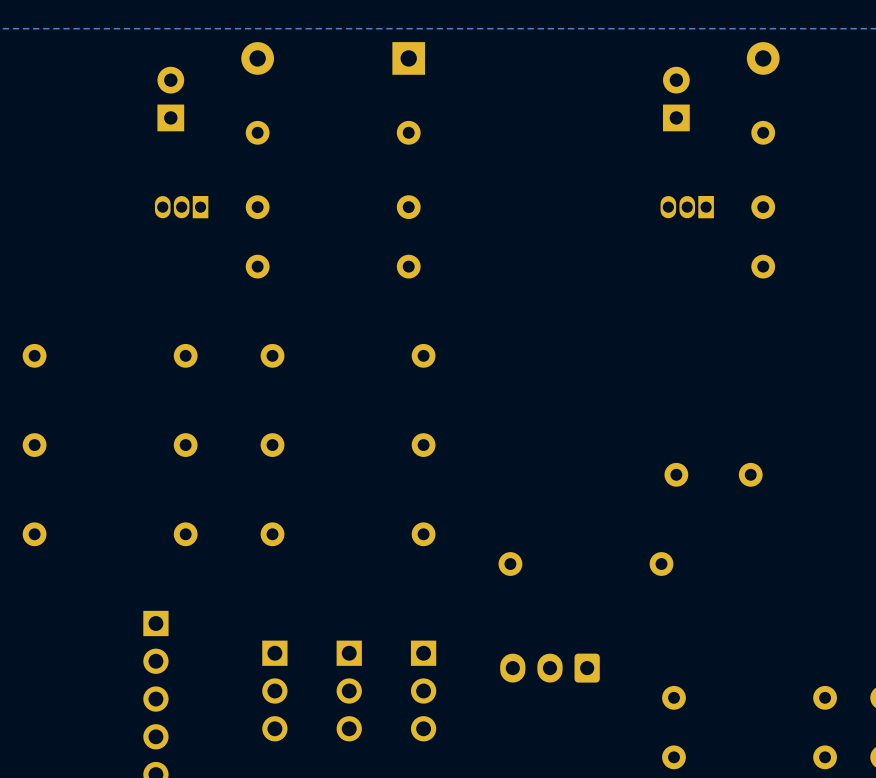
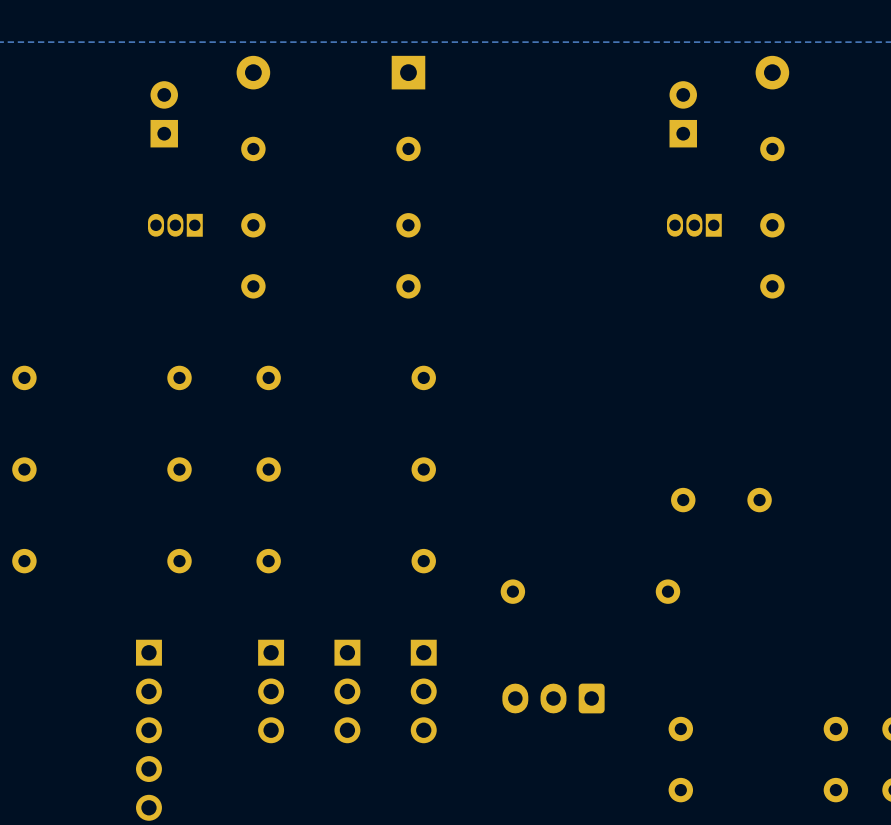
part position: (274, 691) -> (271, 691)
part position: (349, 691) -> (347, 691)
part position: (423, 691) -> (423, 691)

